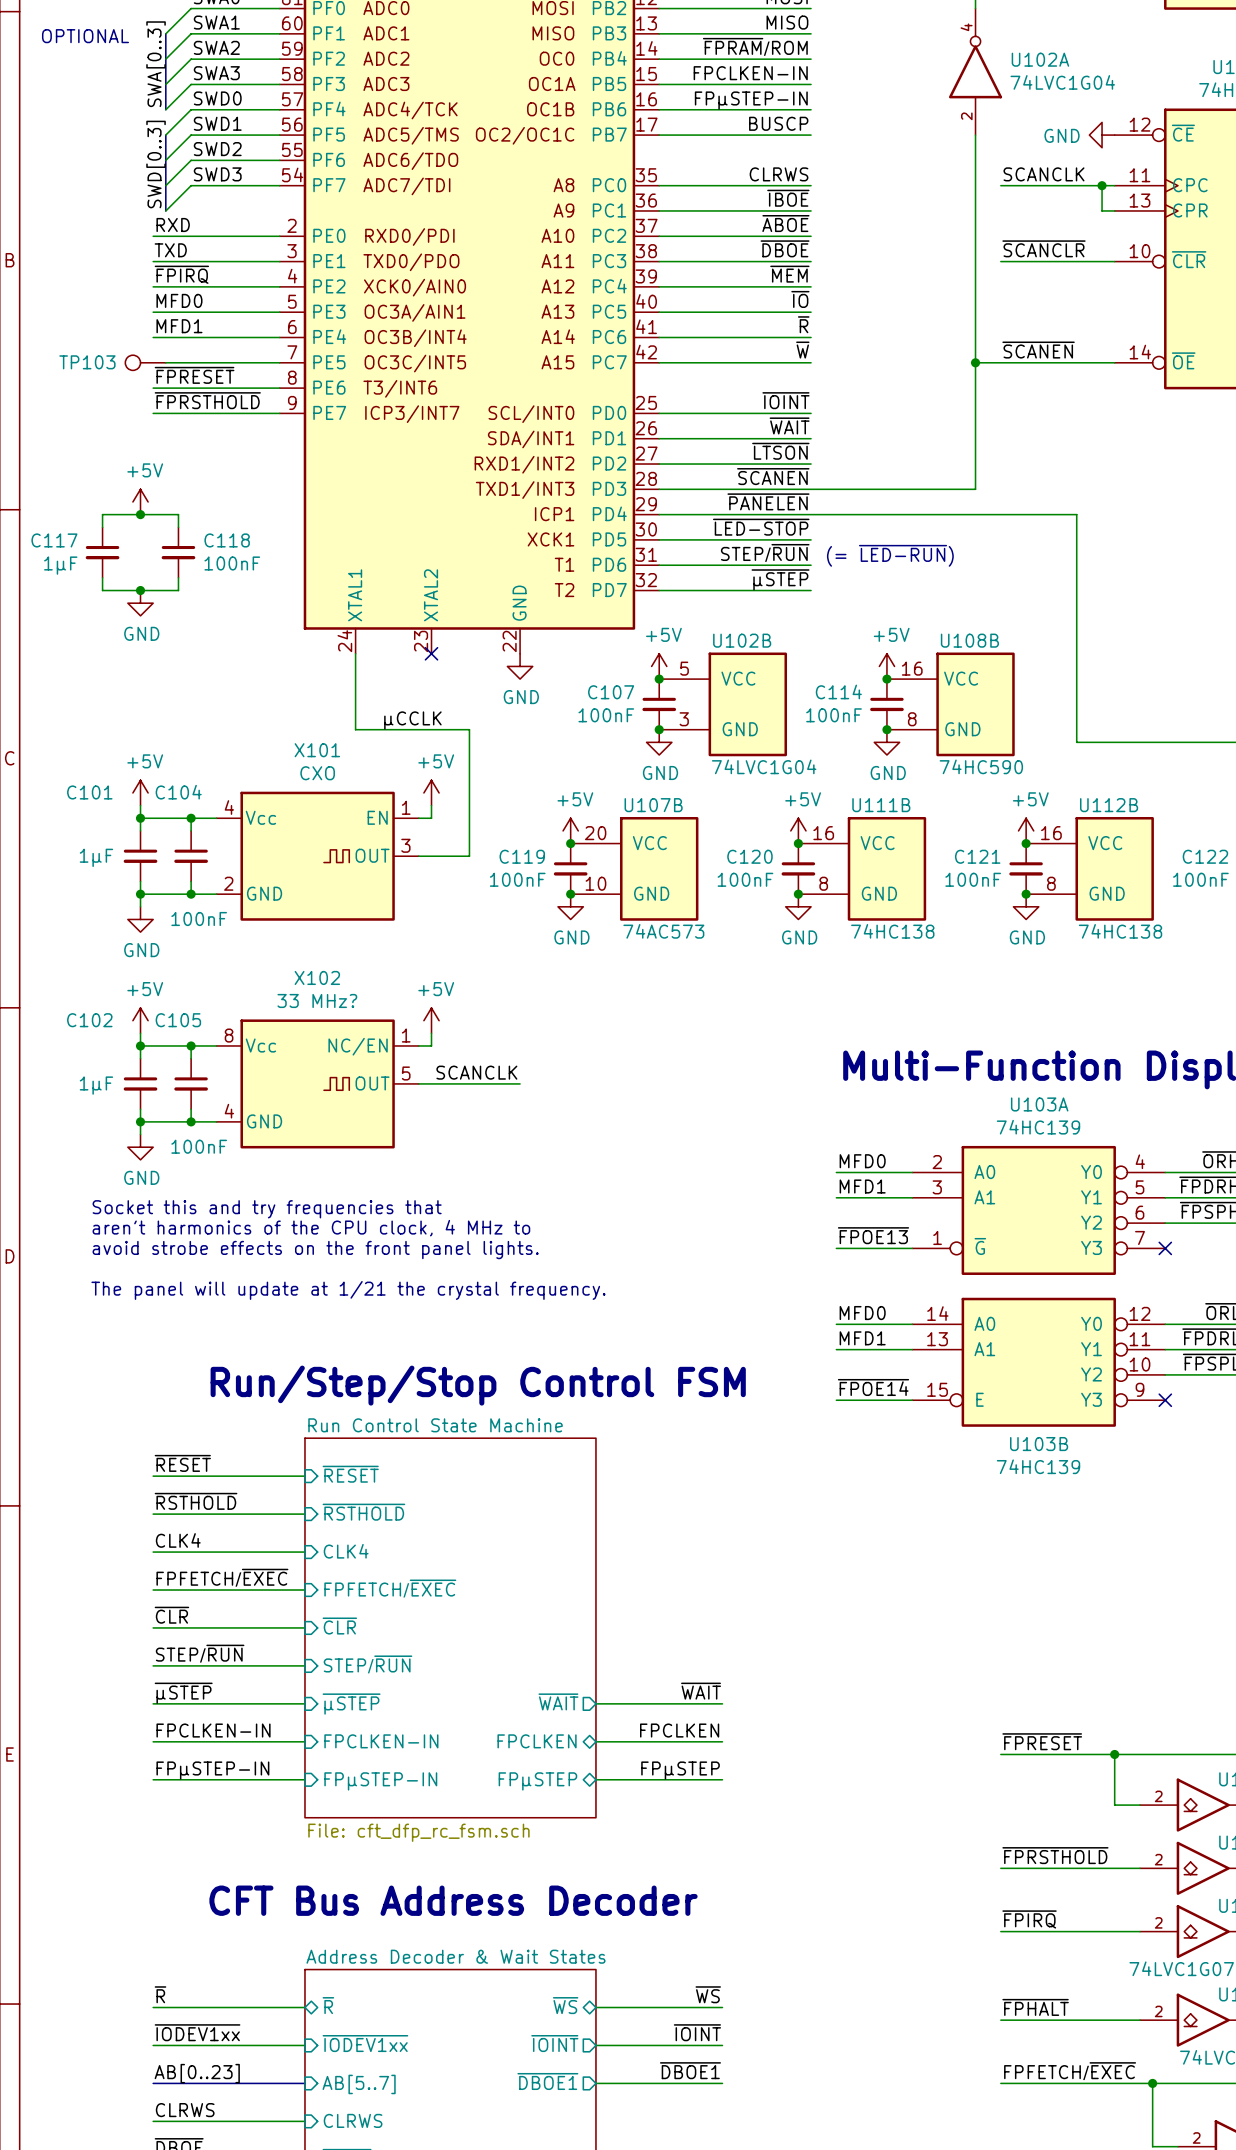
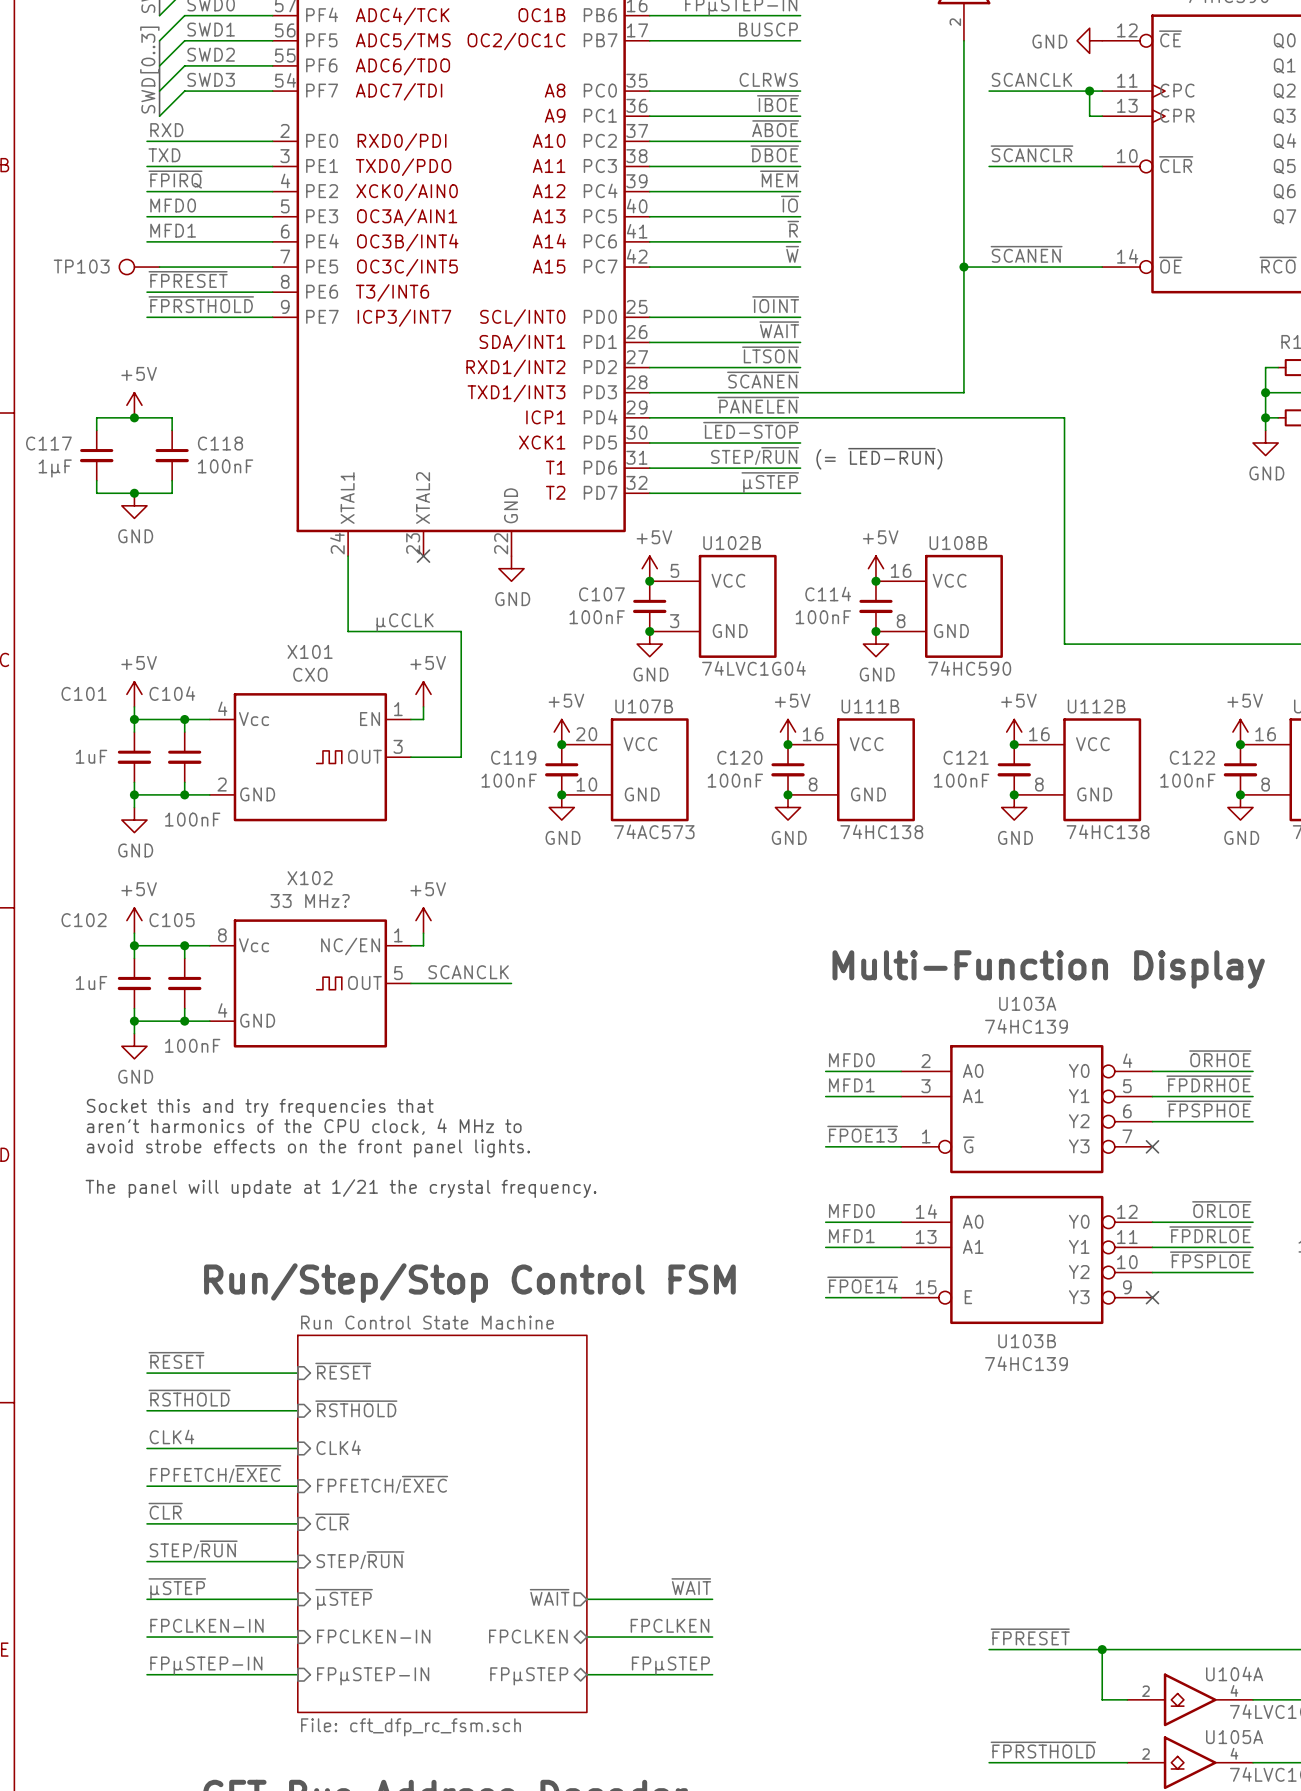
C101 value: 1µF (96, 857) -> 1uF (91, 756)
C102 value: 1µF (96, 1085) -> 1uF (91, 982)

